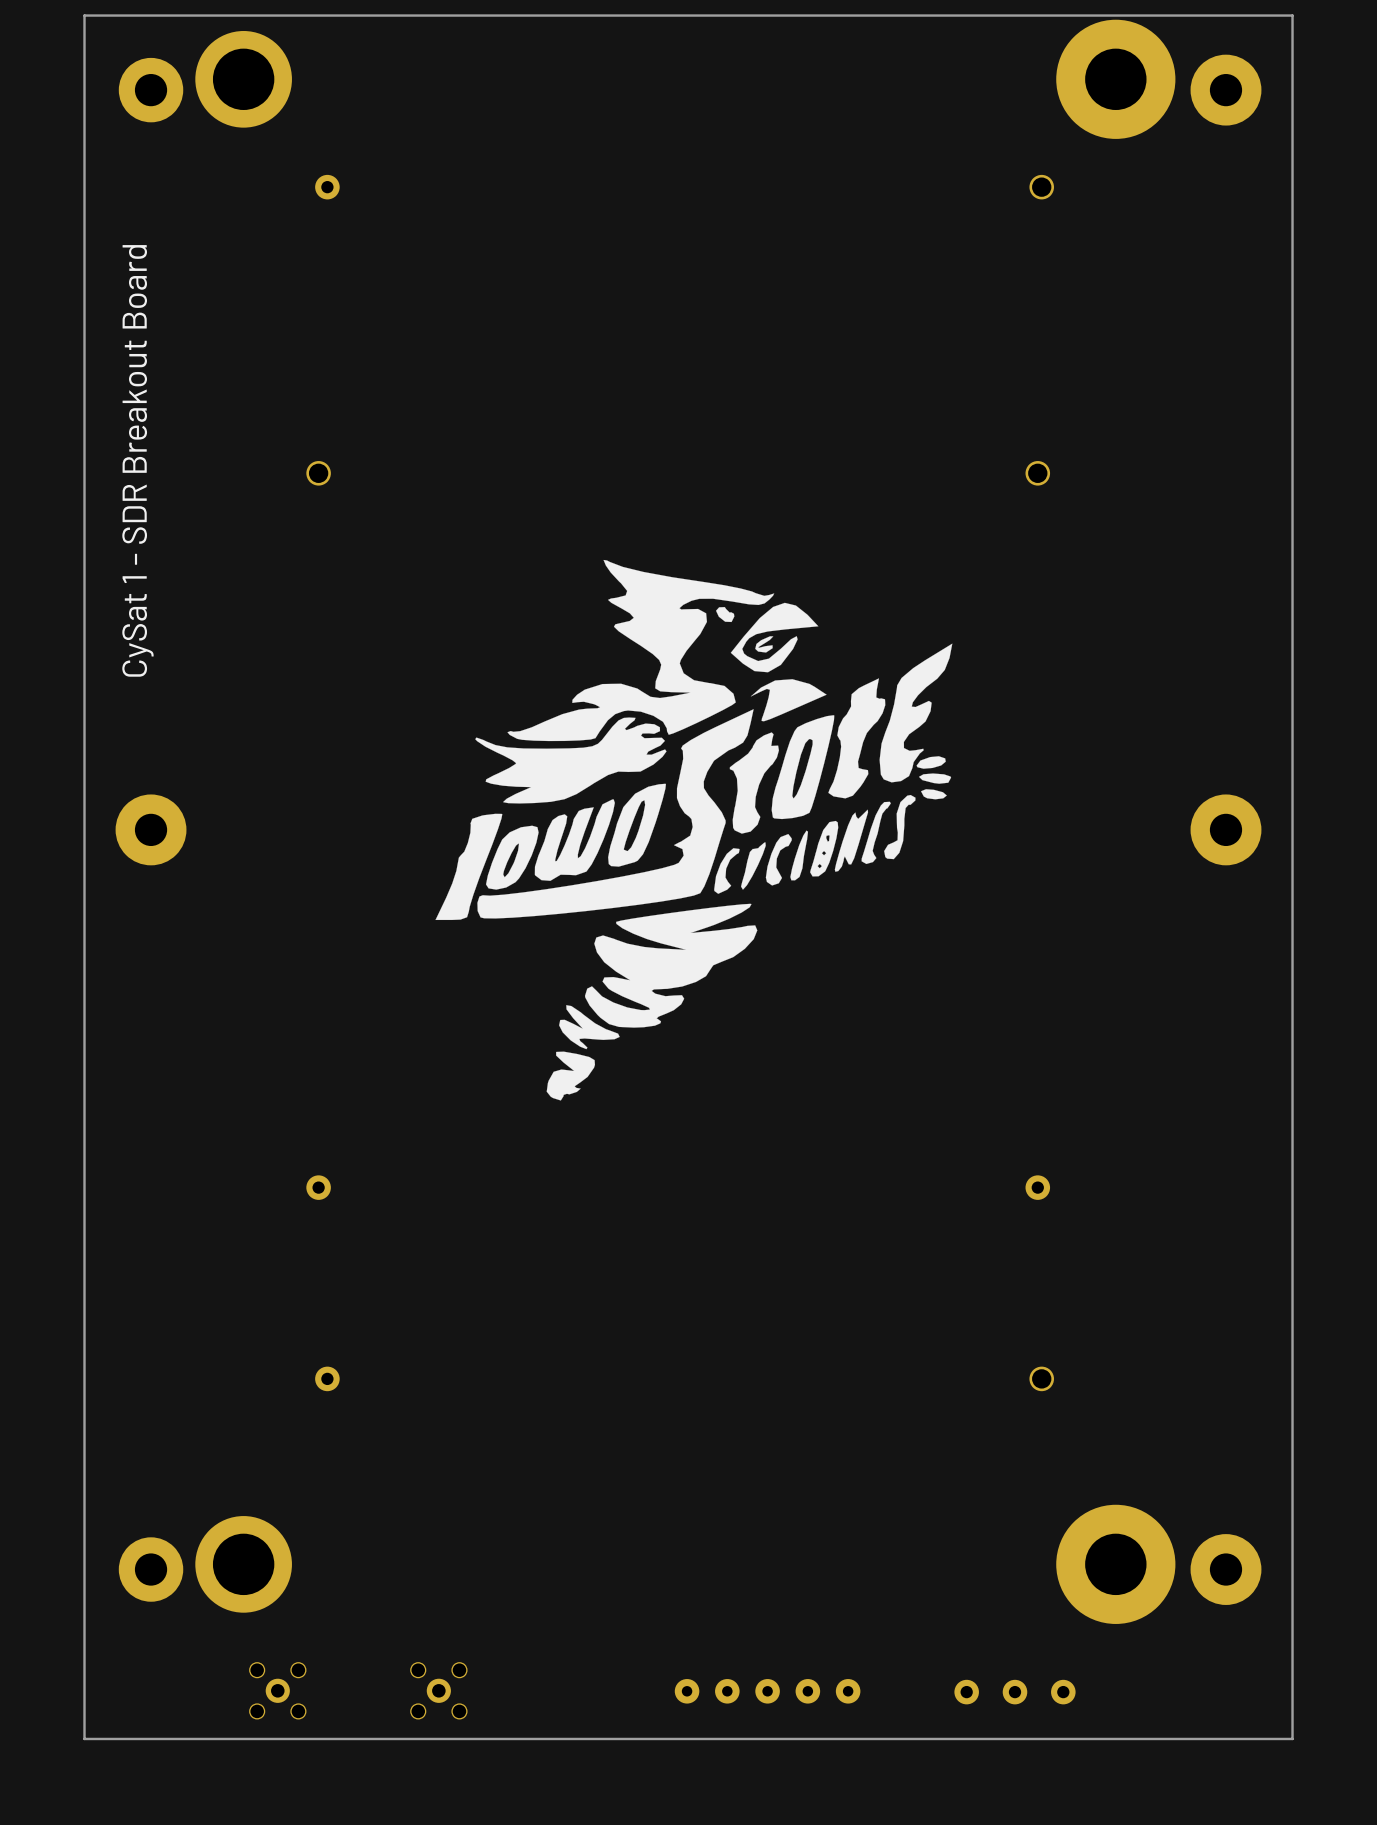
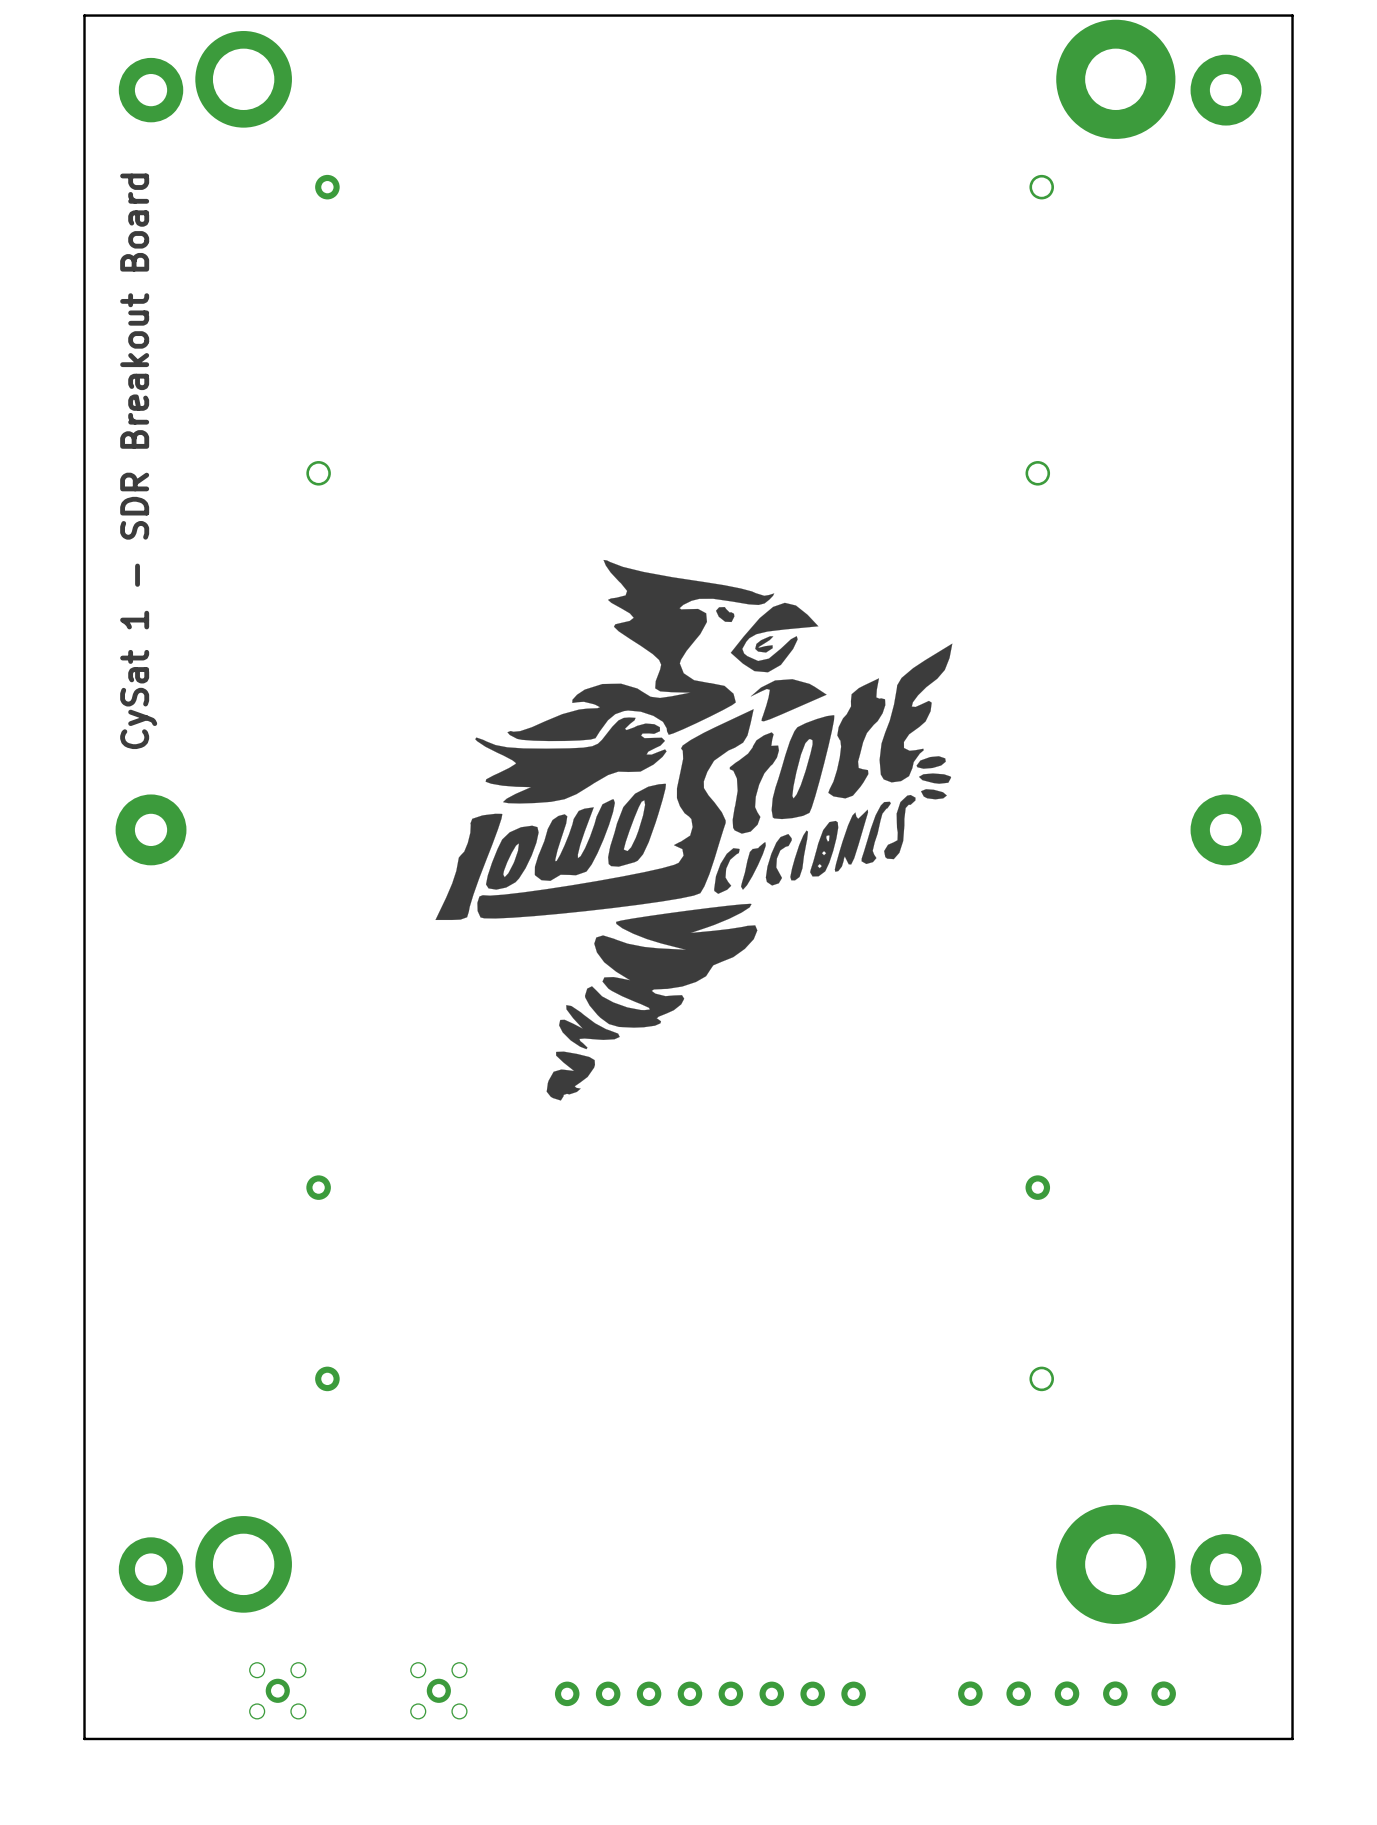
part: (767, 1691) -> none
part: (1014, 1692) -> none
part: none -> (710, 1693)
part: none -> (1067, 1693)

